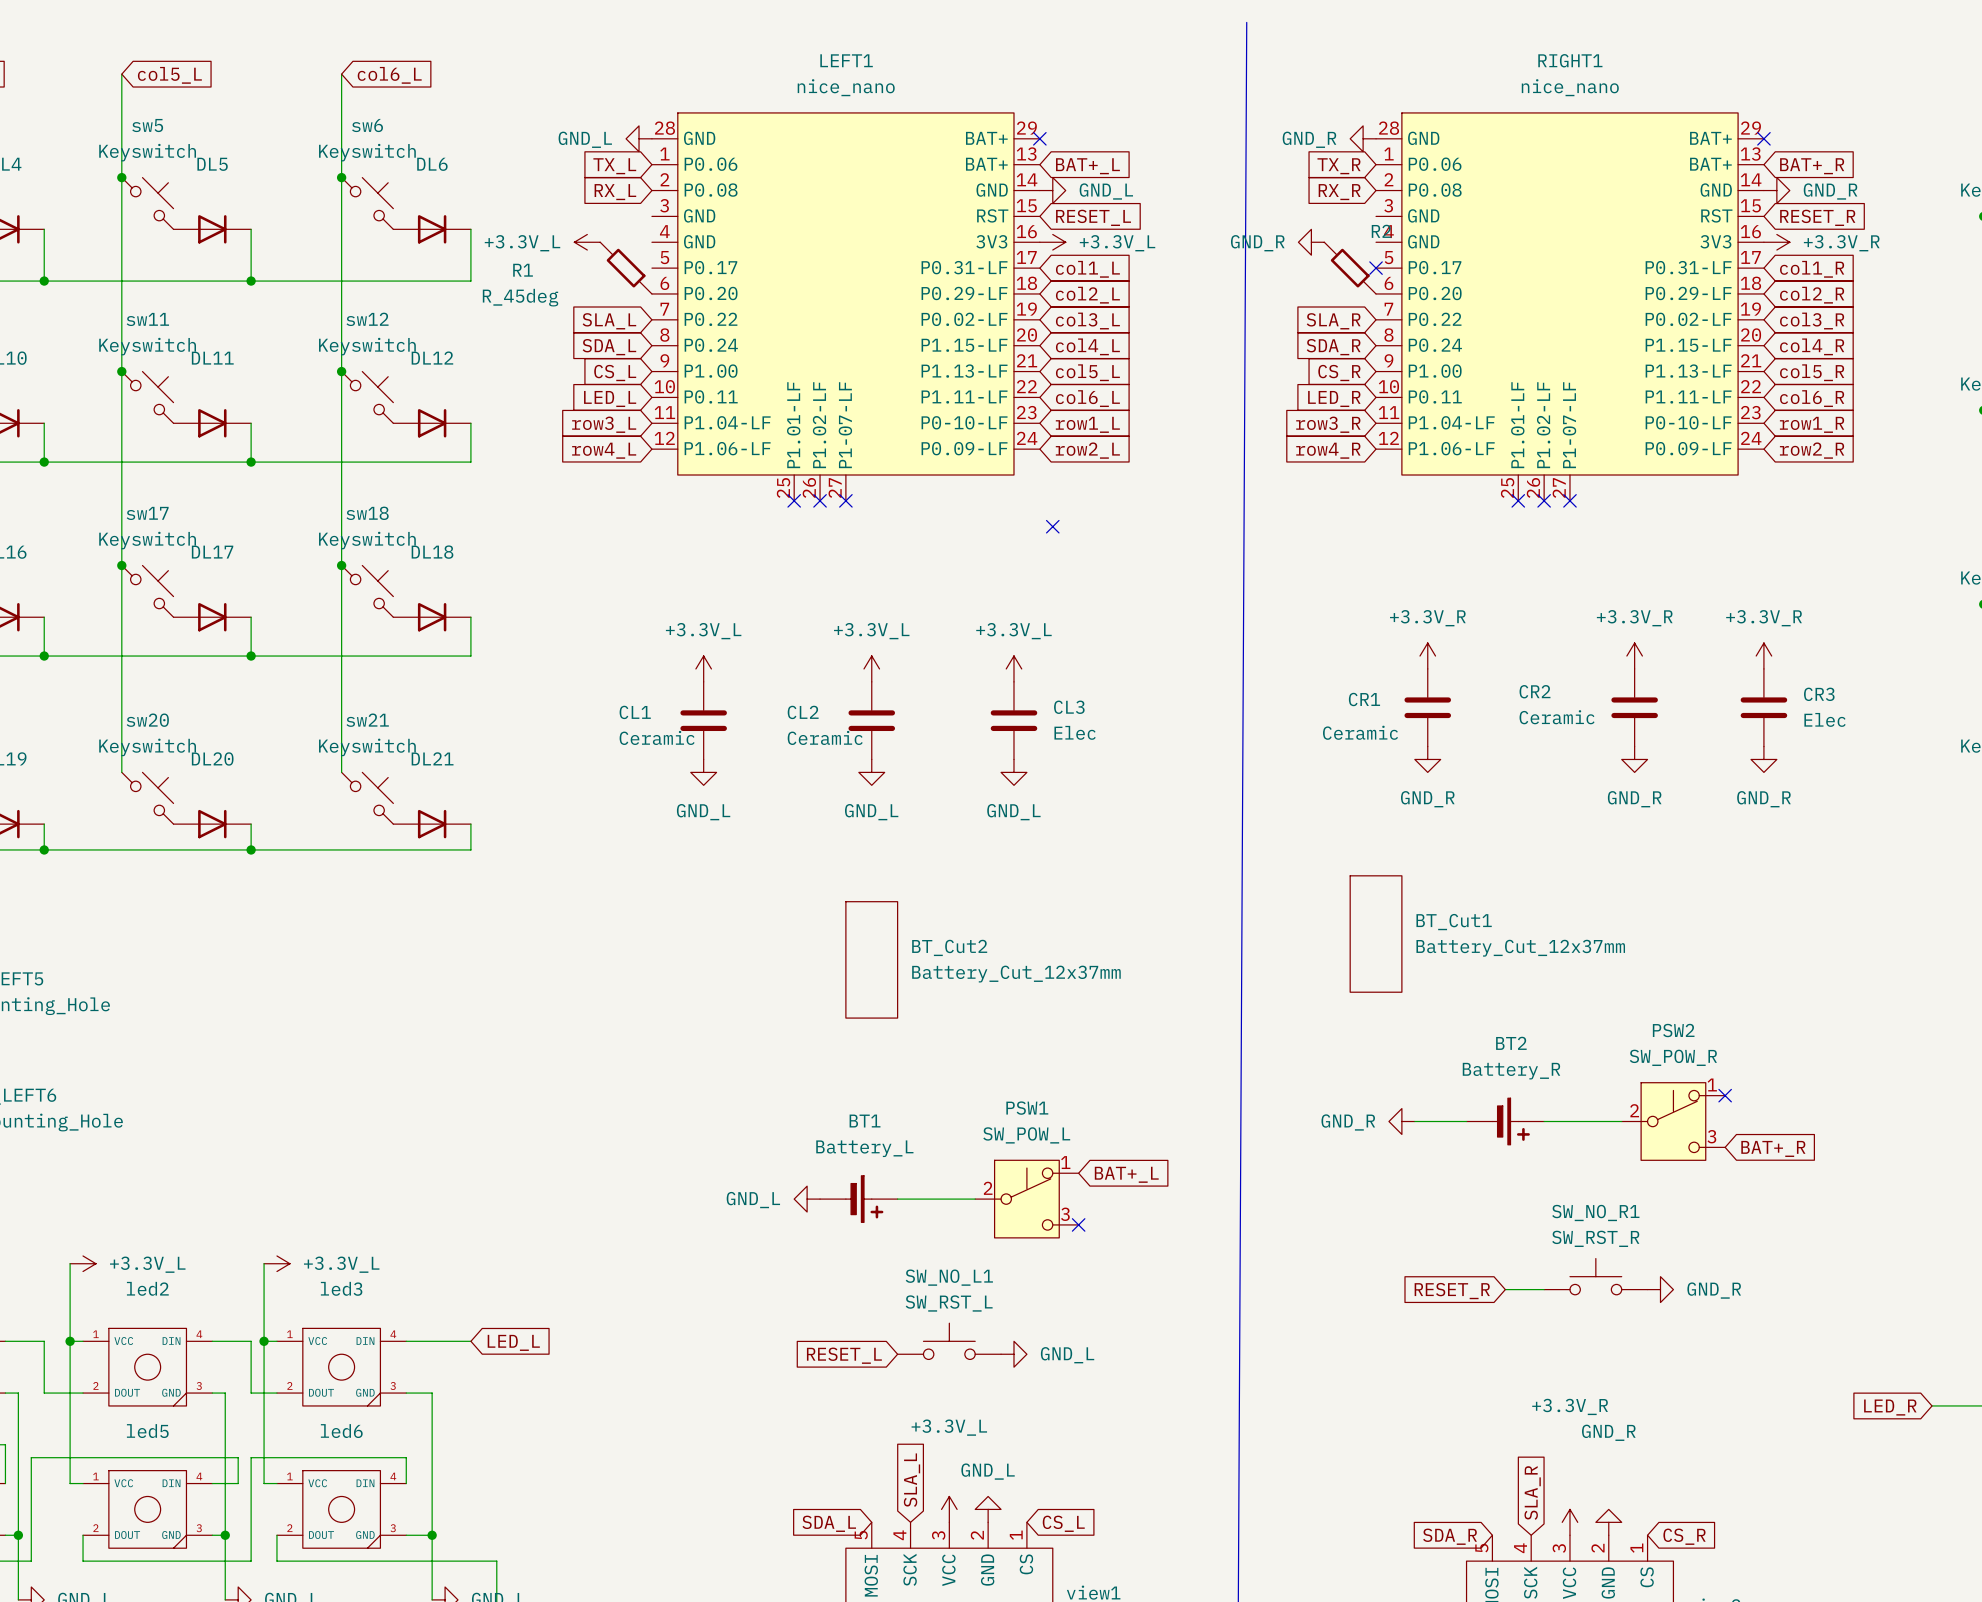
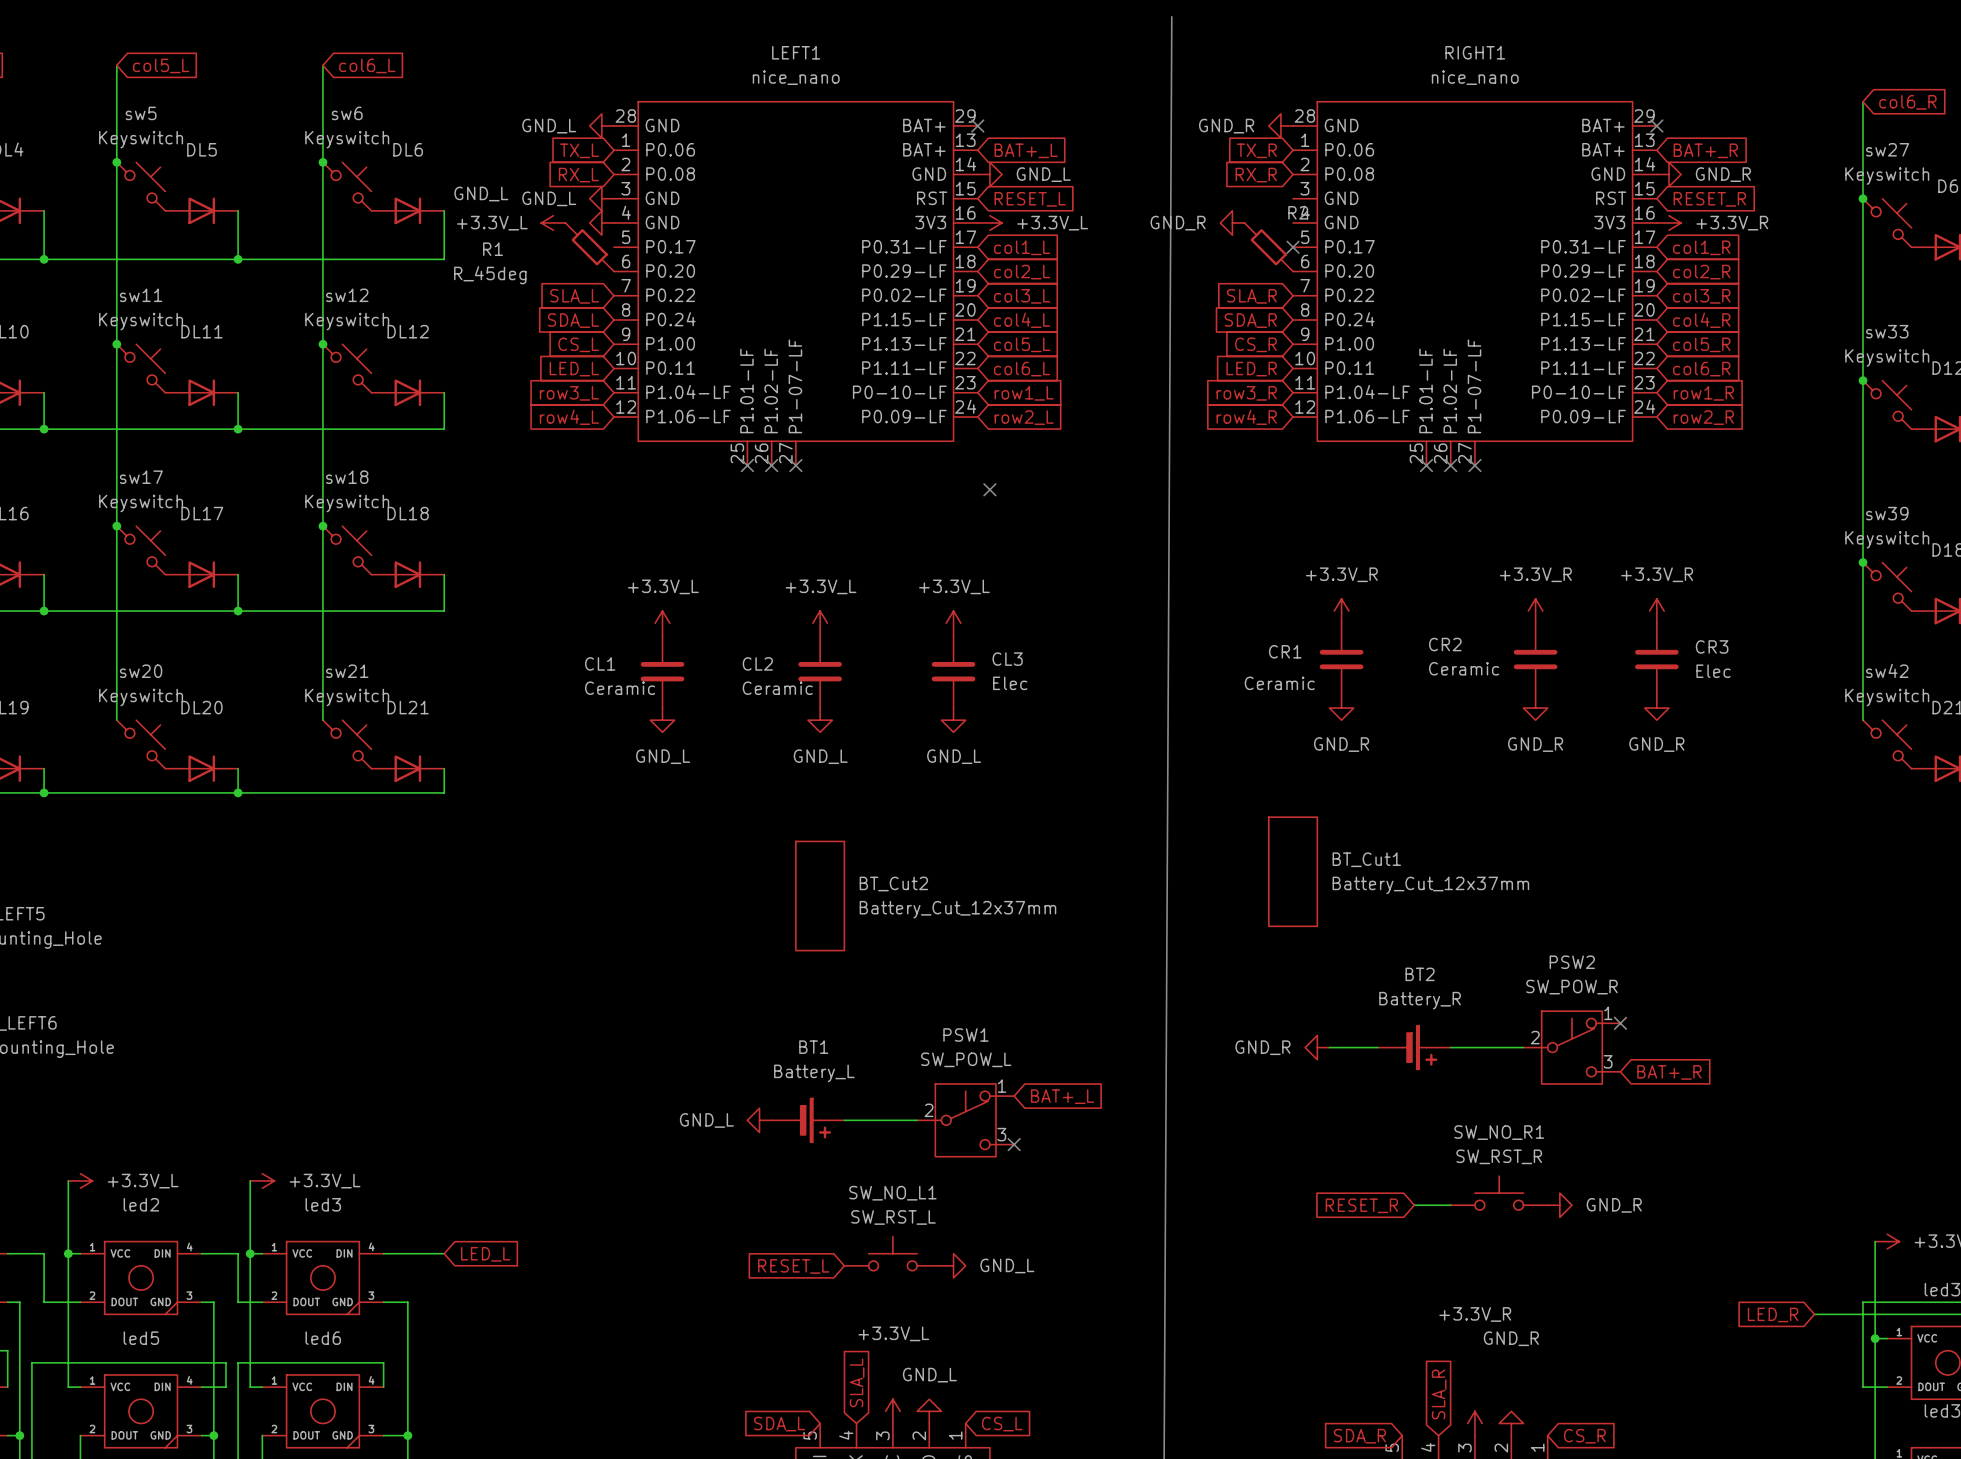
power symbol: none -> GND_L (601, 198)
power symbol: none -> GND_L (601, 222)

